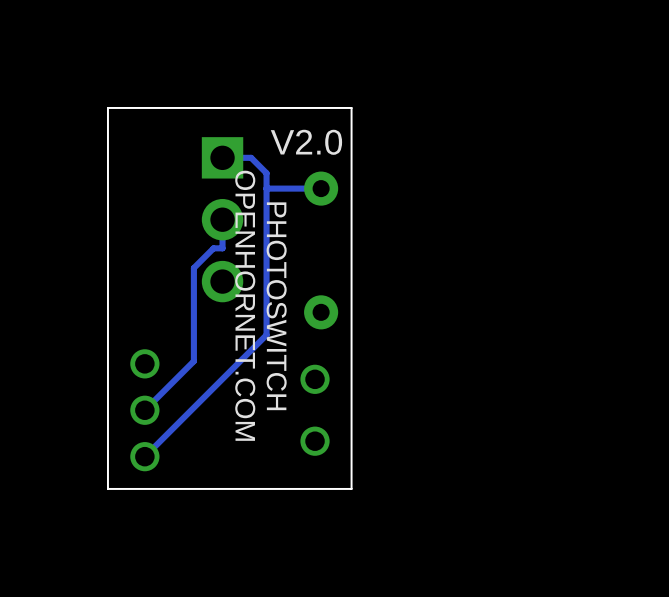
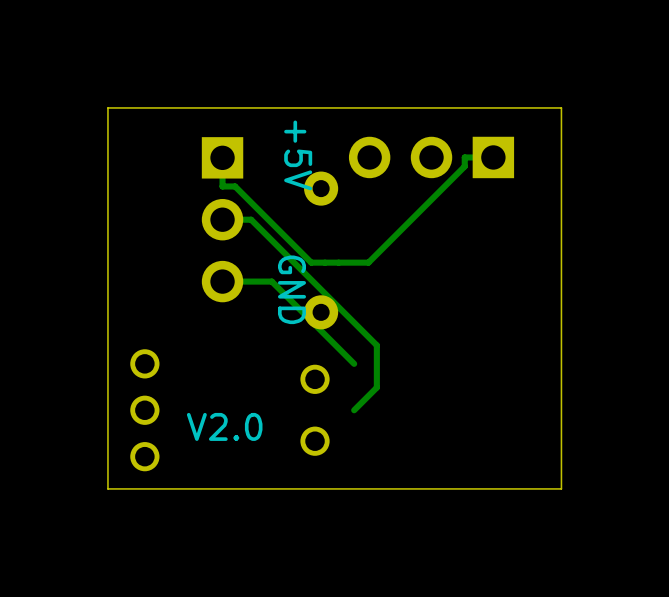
board edge: (351, 107) (351, 488) -> (351, 107) (561, 107) (561, 488) (351, 488)
text position: V2.0 (306, 142) -> V2.0 (224, 426)
text: none -> +5V (298, 155)
track: (222, 157) (251, 157) (266, 173) (266, 334) (144, 456) -> (222, 157) (222, 186) (235, 186) (311, 262) (368, 262) (464, 166) (464, 157) (493, 157)
part: none -> (431, 157)
track: (321, 188) (266, 188) -> none
track: (222, 219) (222, 248) (213, 248) (193, 268) (193, 361) (144, 410) -> (222, 219) (251, 219) (376, 345) (376, 387) (354, 410)
track: none -> (222, 281) (271, 281) (354, 363)
text: none -> GND (291, 289)
text: OPENHORNET.COM (245, 305) -> none
text: PHOTOSWITCH (276, 306) -> none

